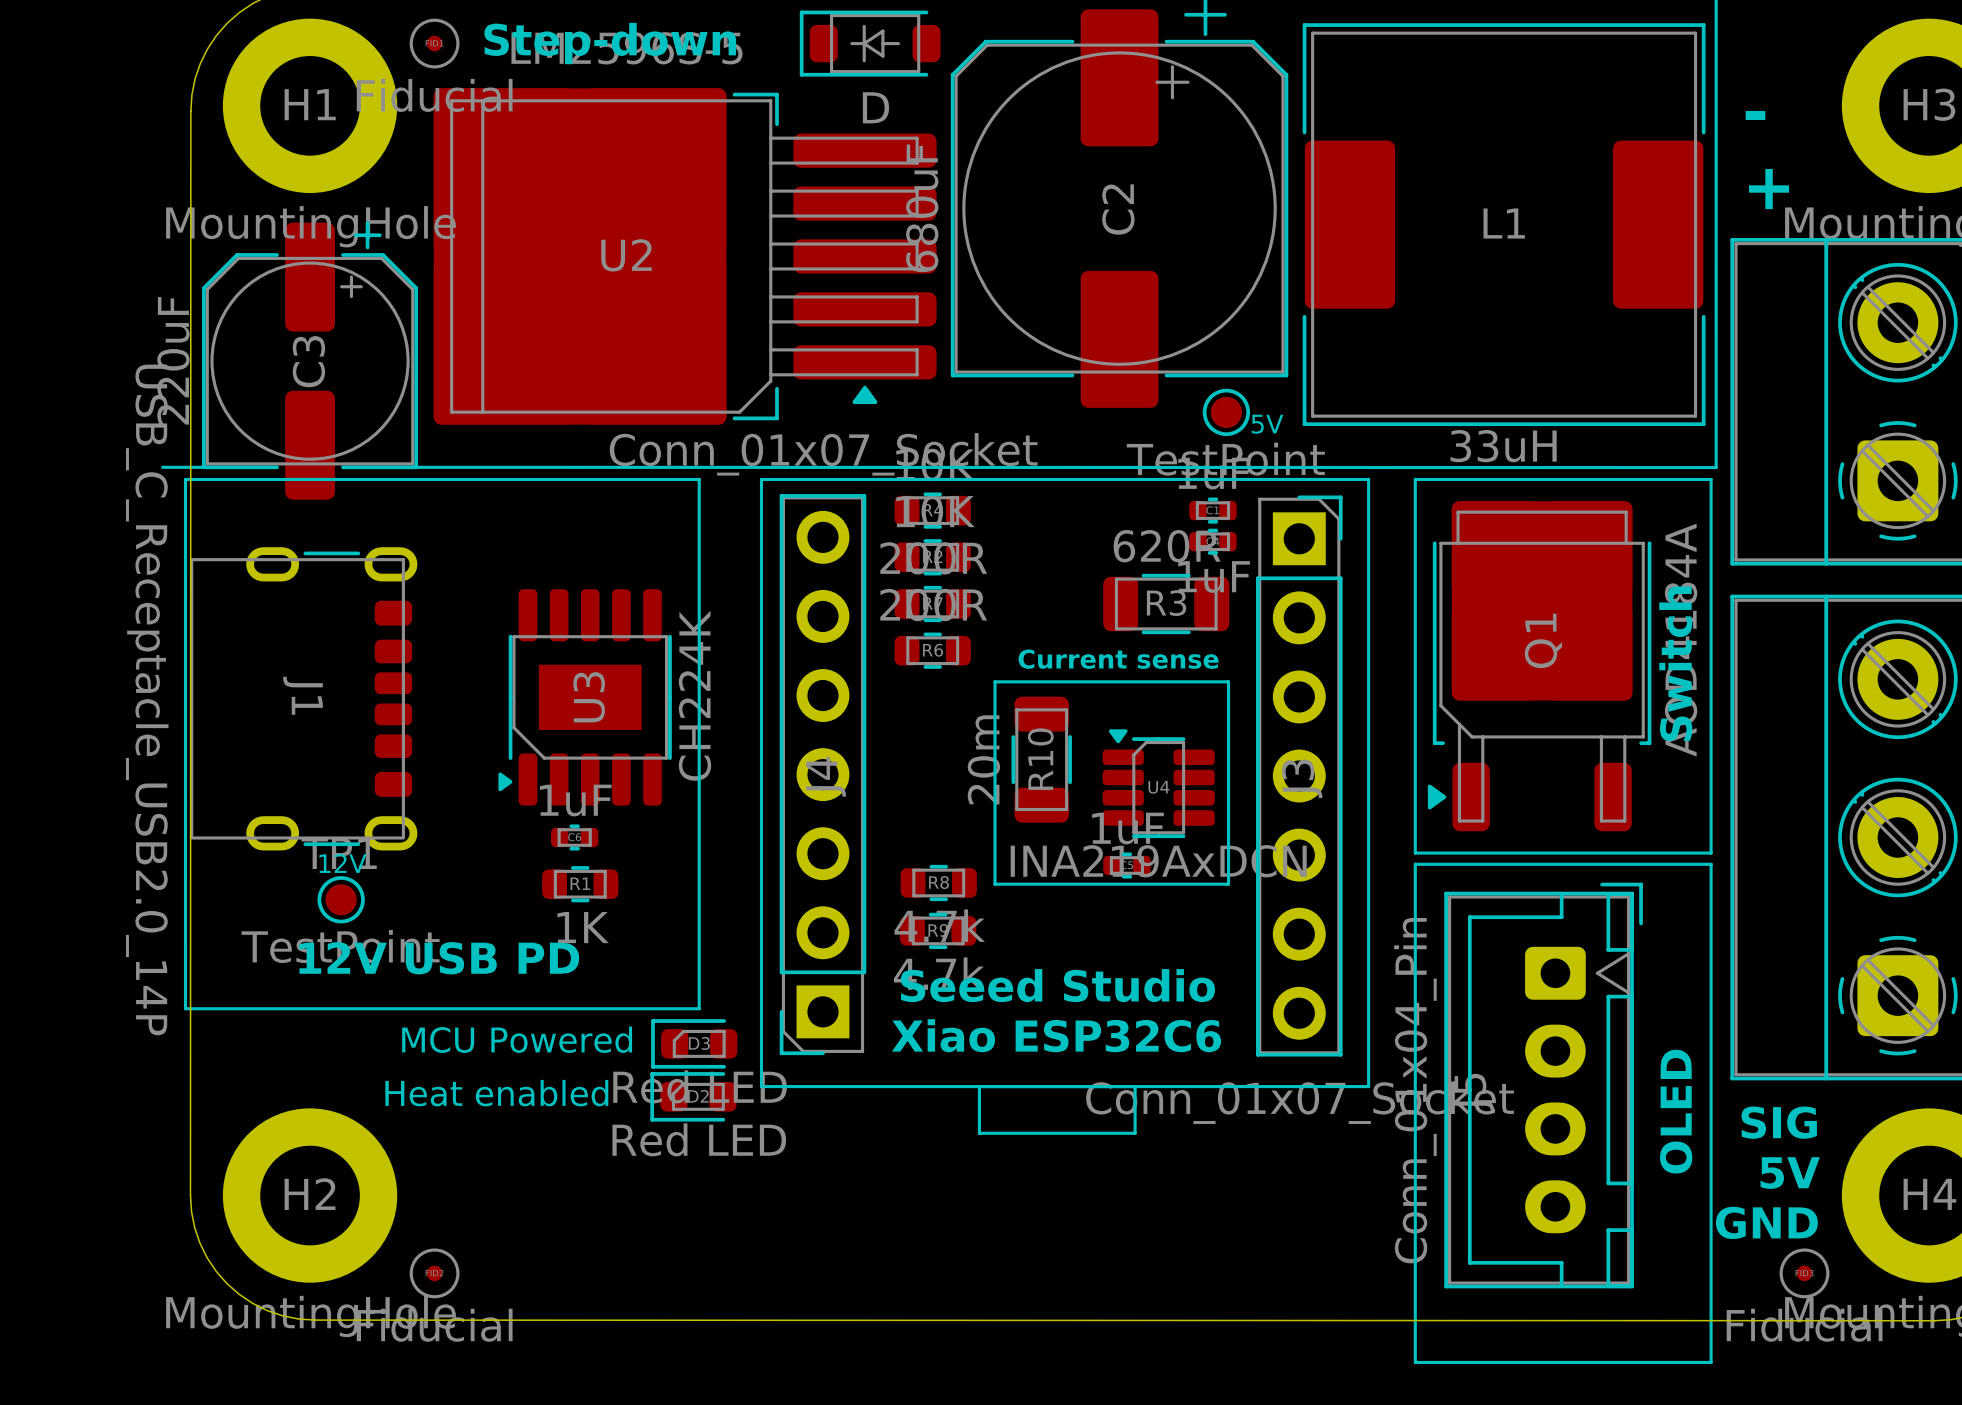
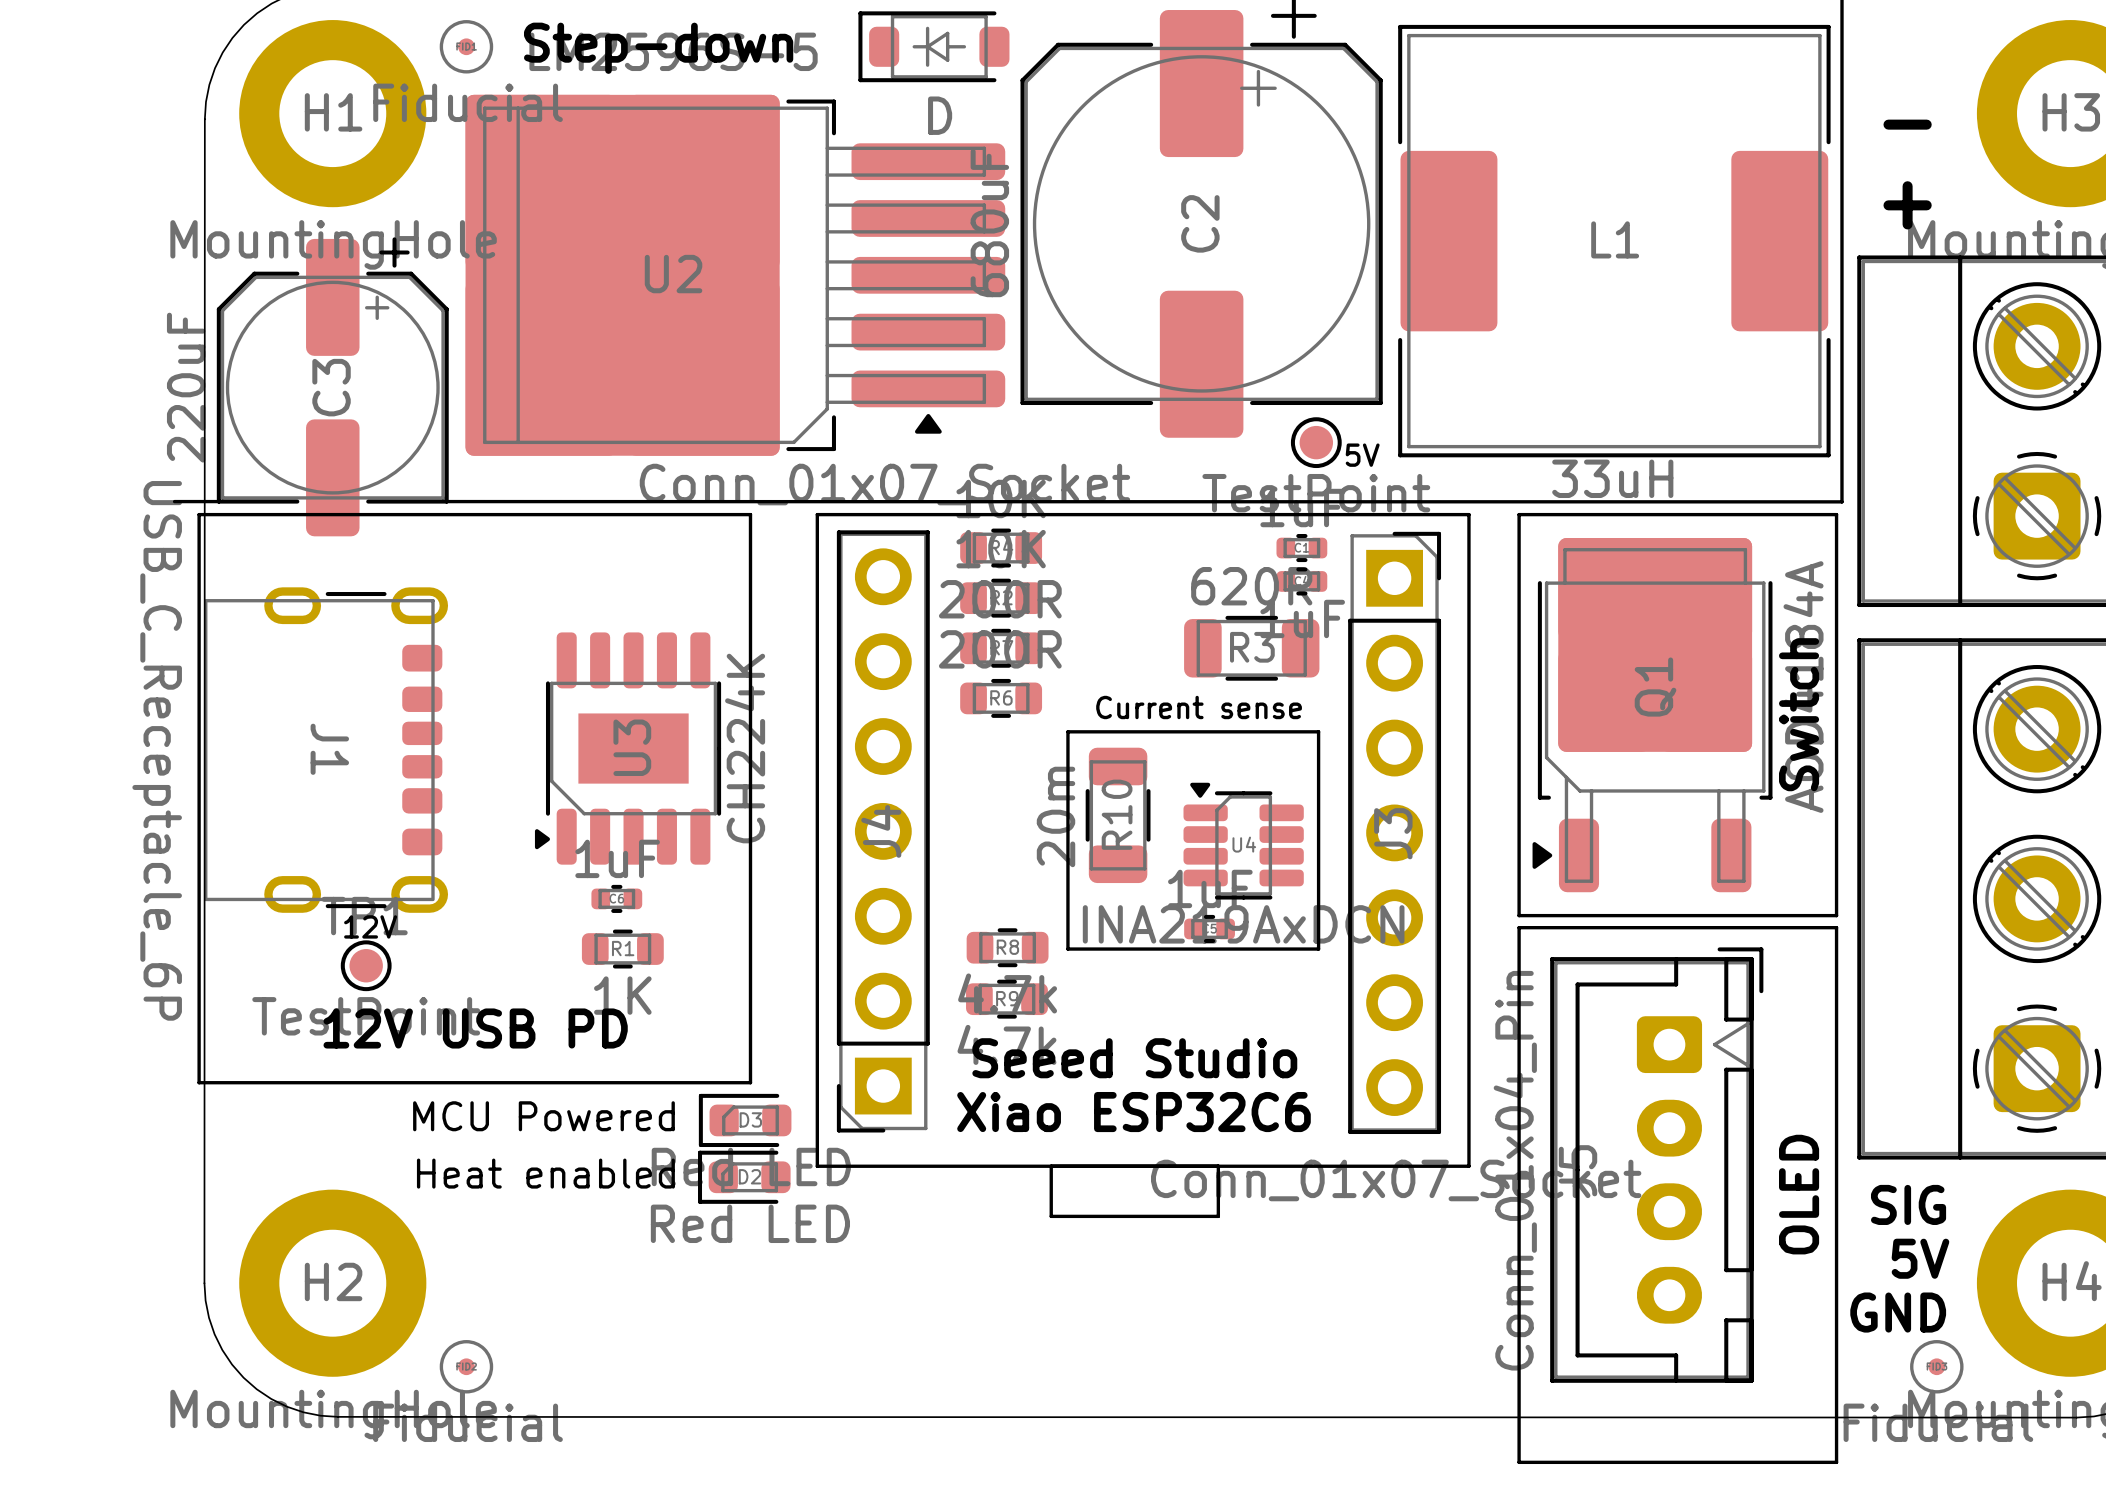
J1 value: USB_C_Receptacle_USB2.0_14P (147, 699) -> USB_C_Receptacle_6P (157, 750)

